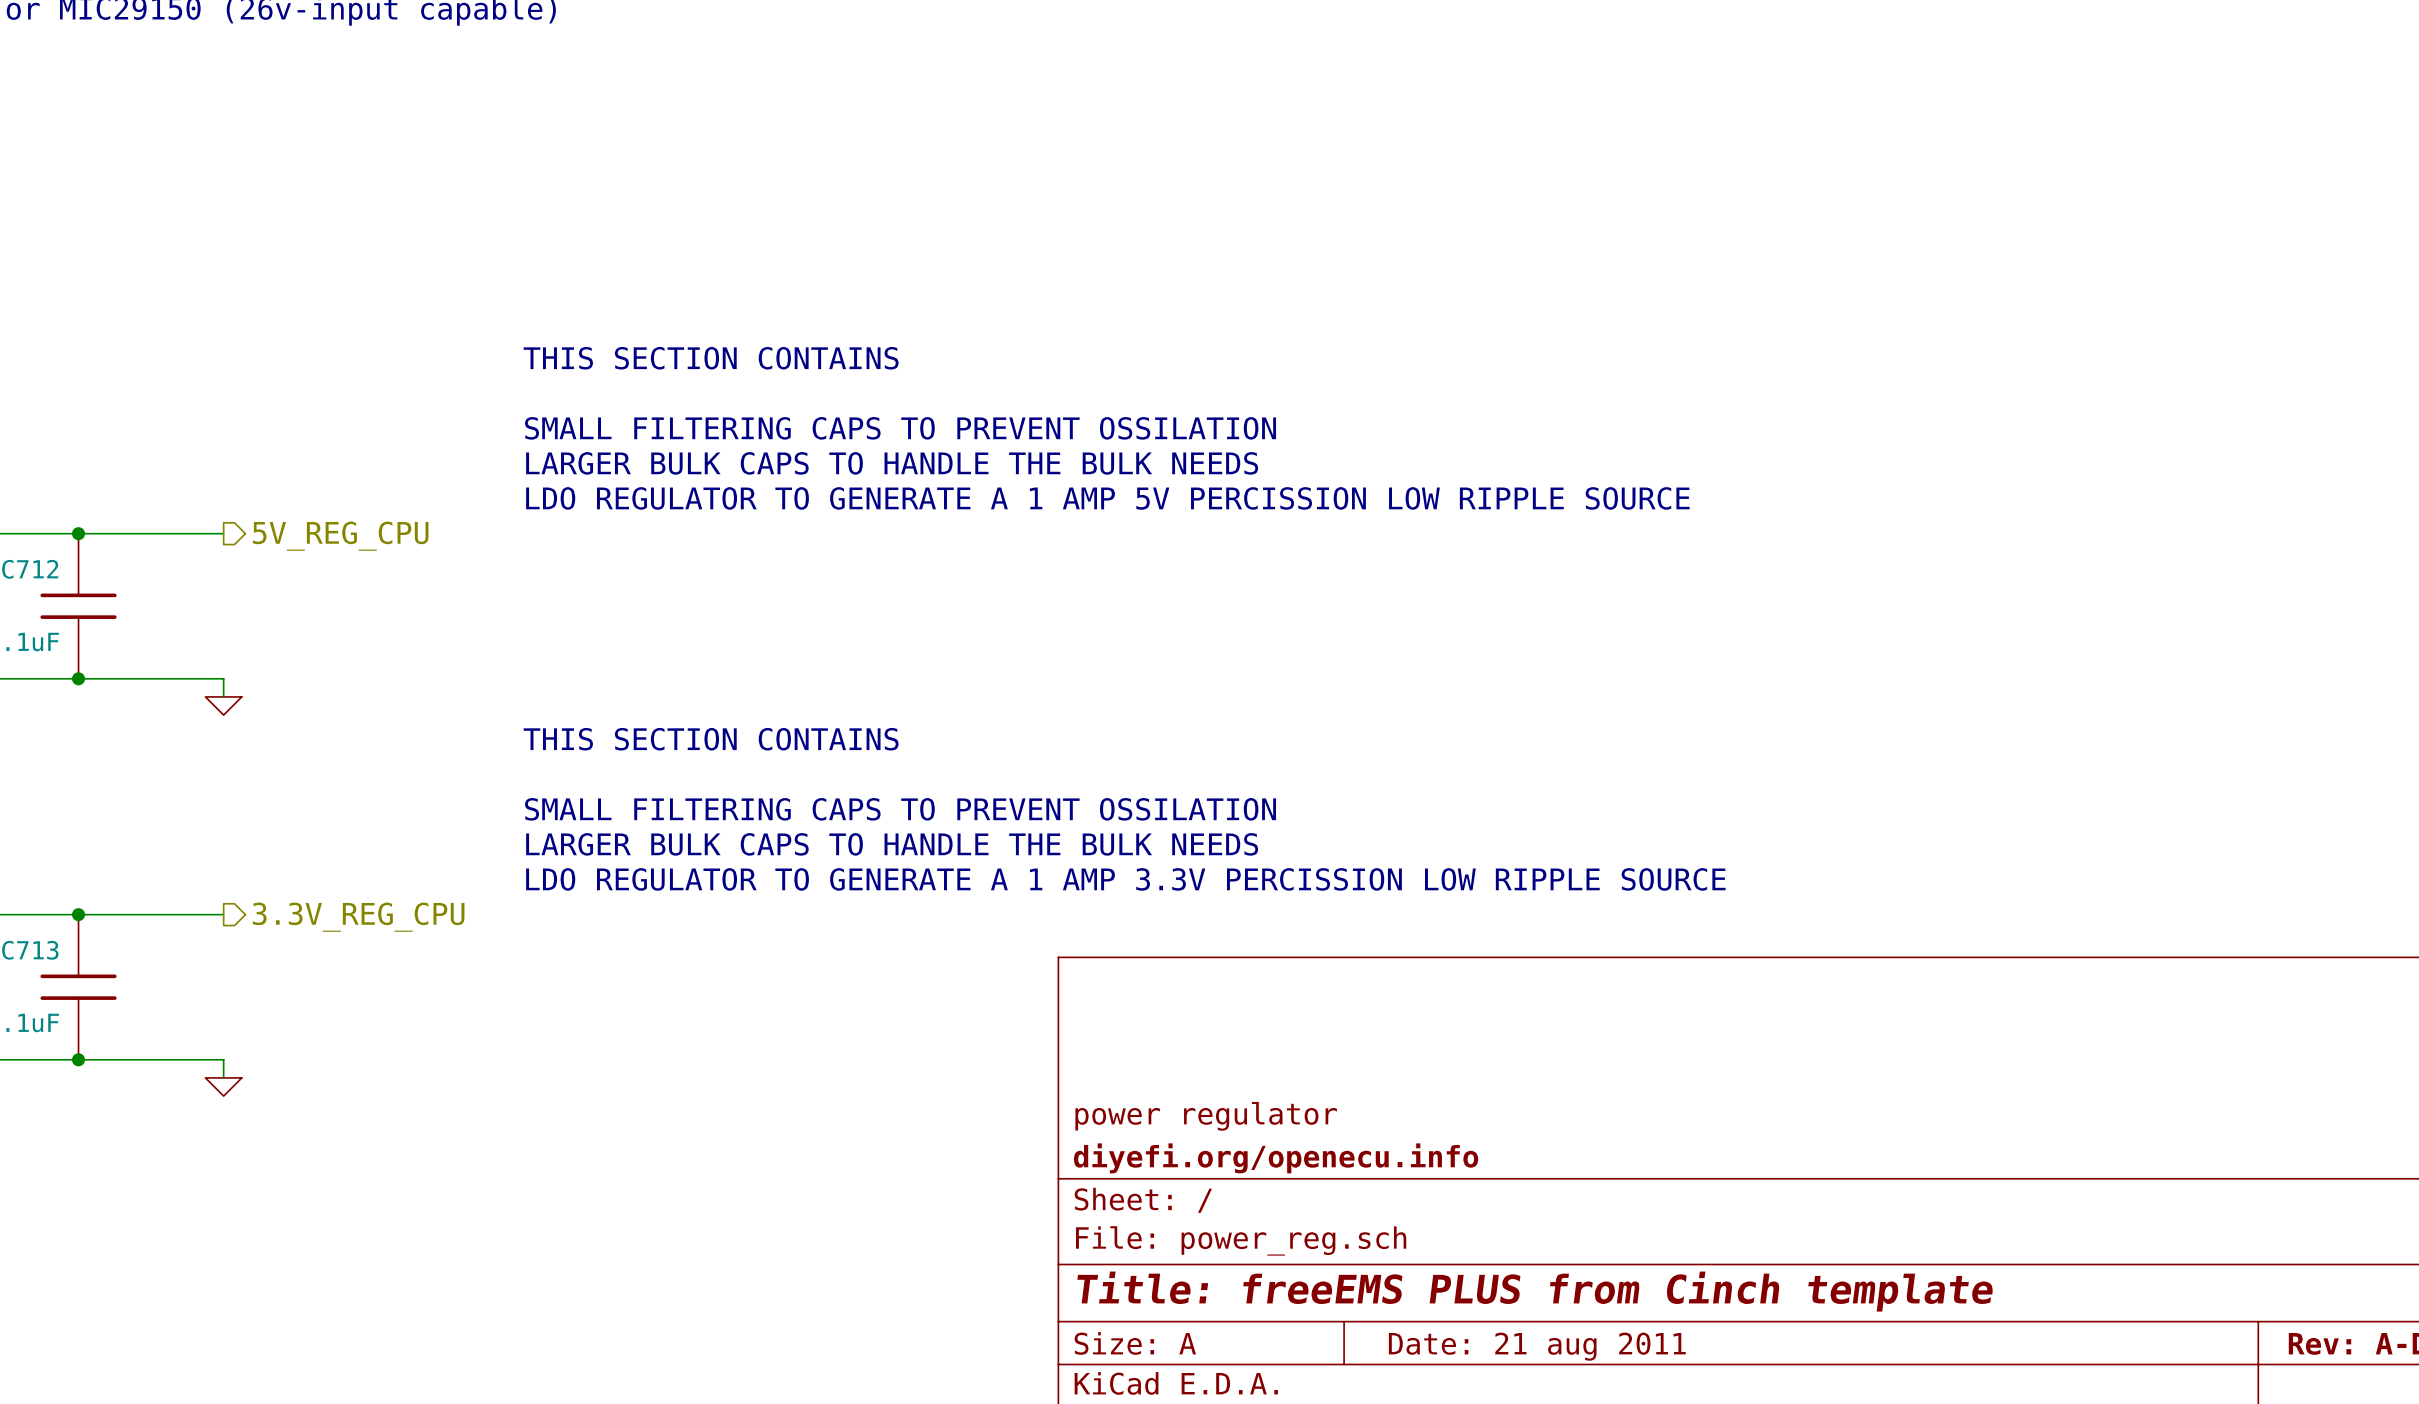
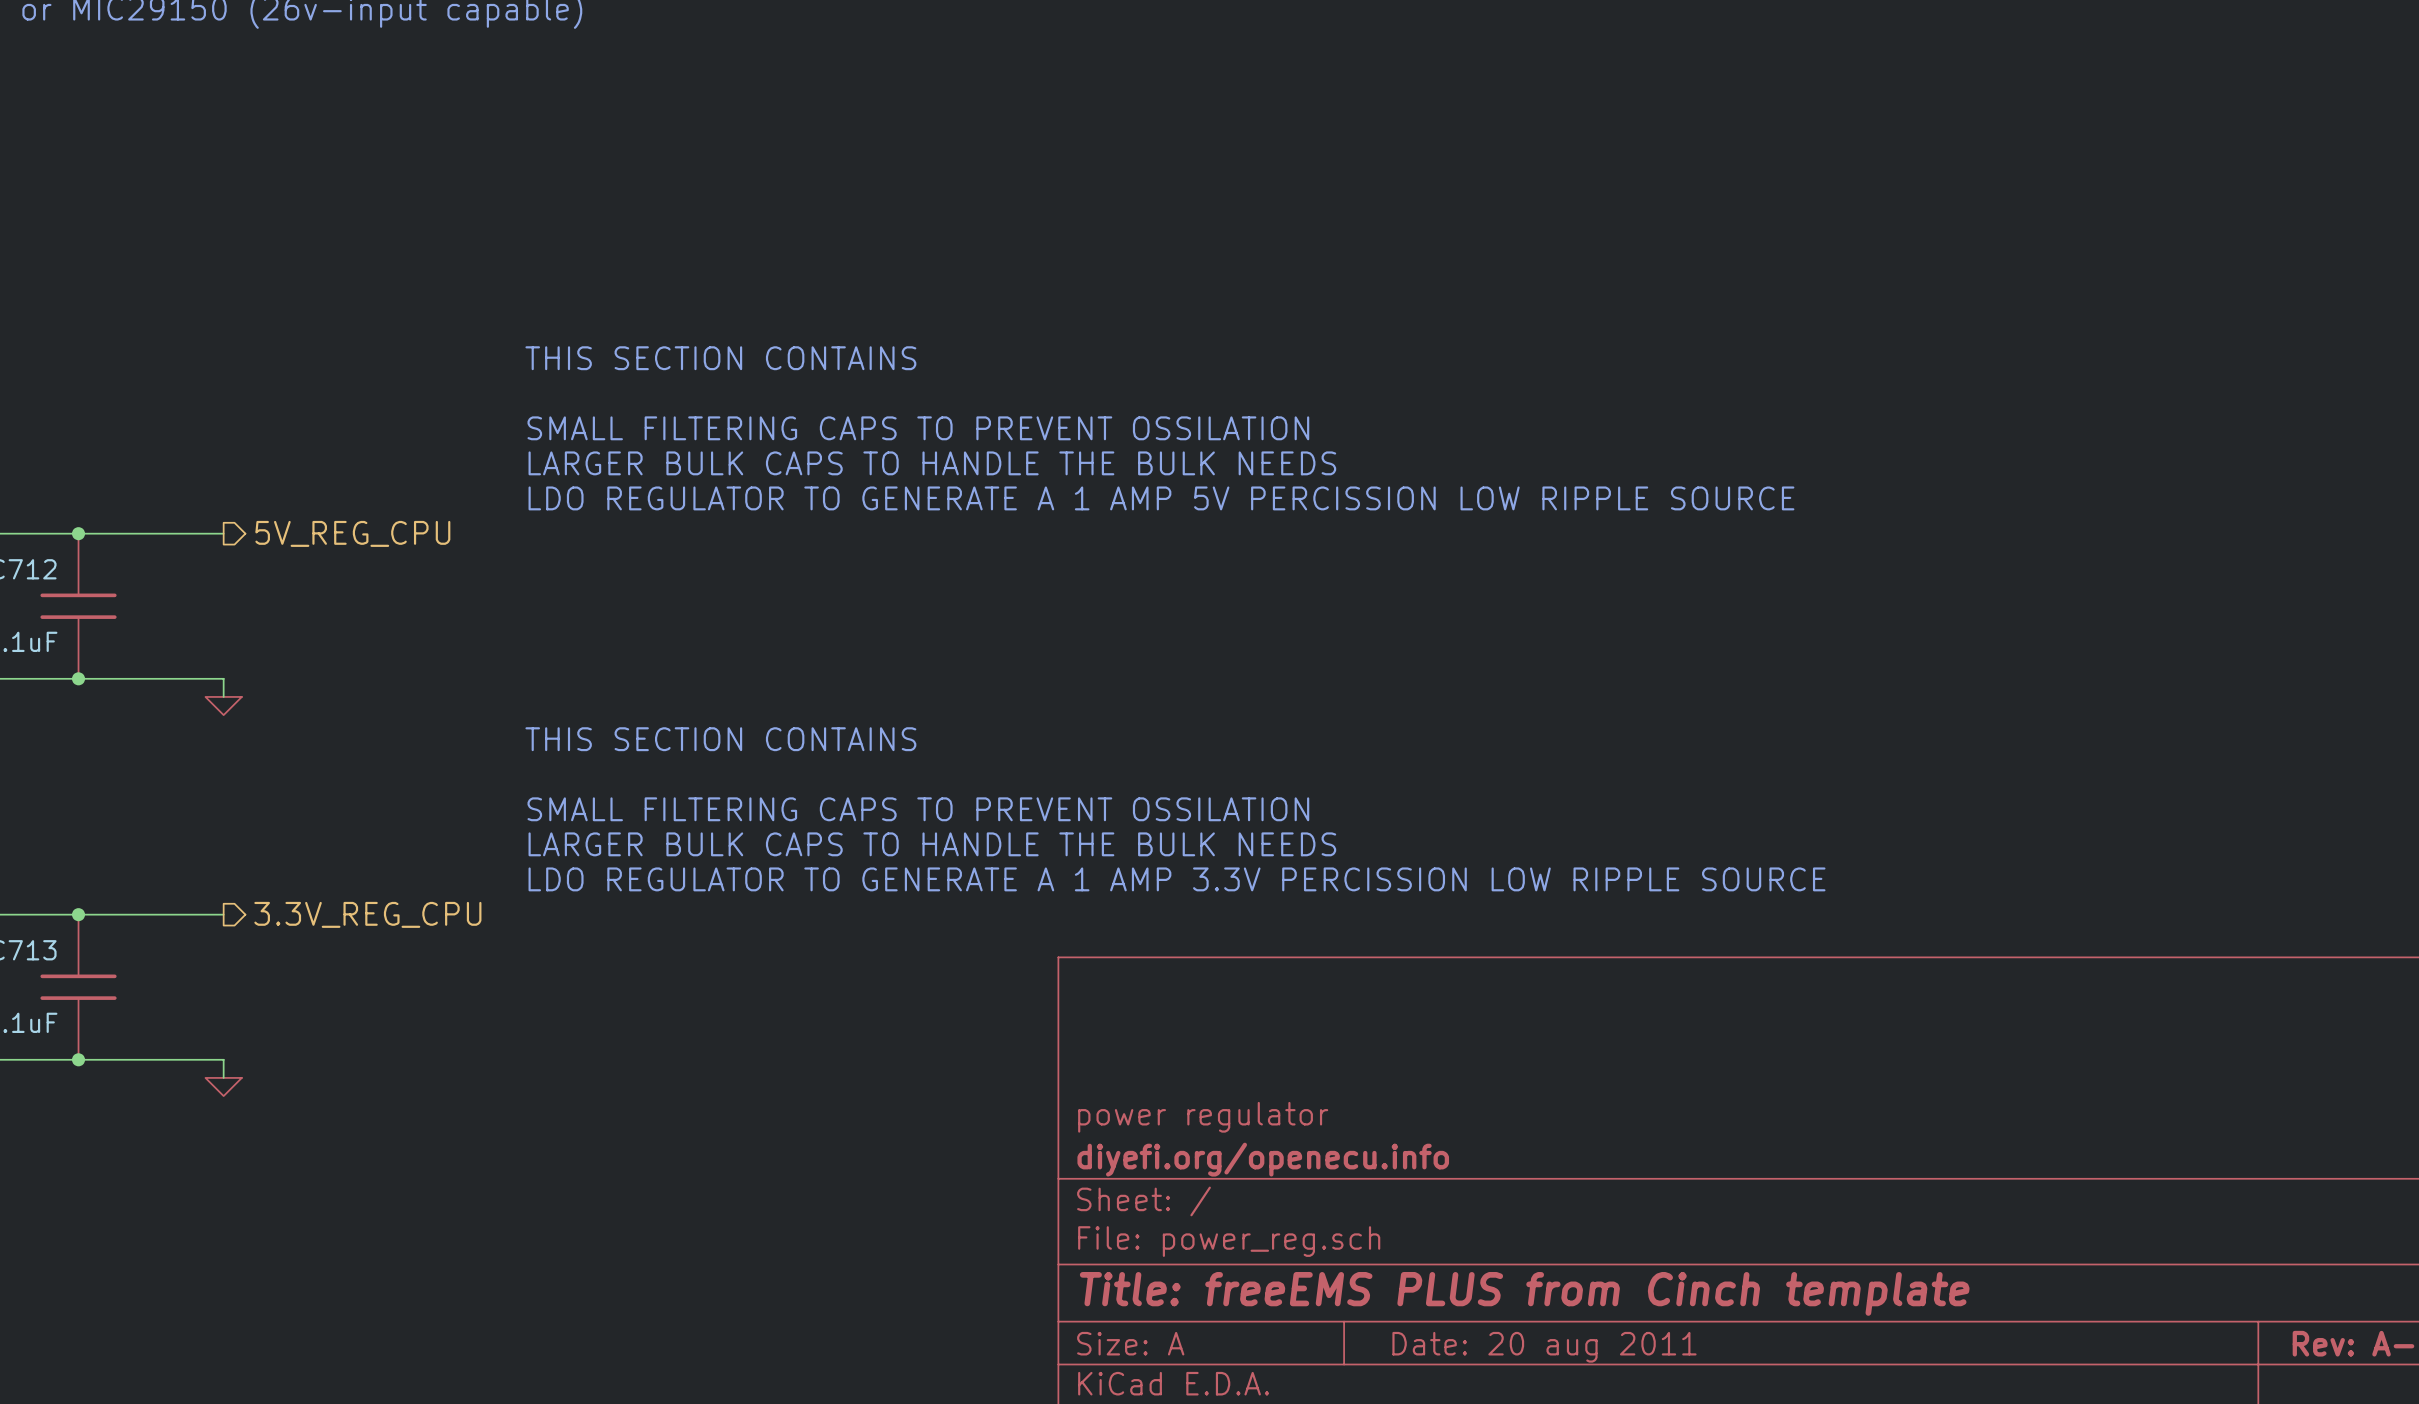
title block: Date: 21 aug 2011 (1537, 1346) -> Date: 20 aug 2011 (1544, 1347)

